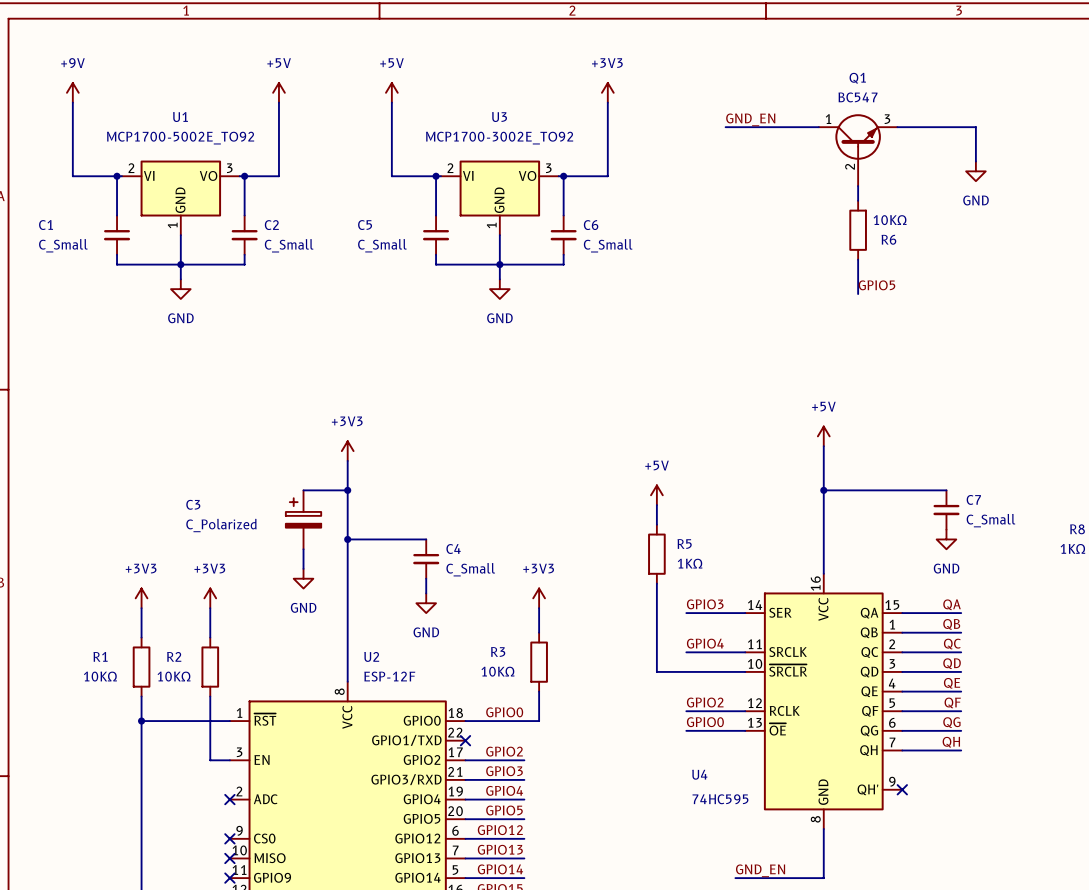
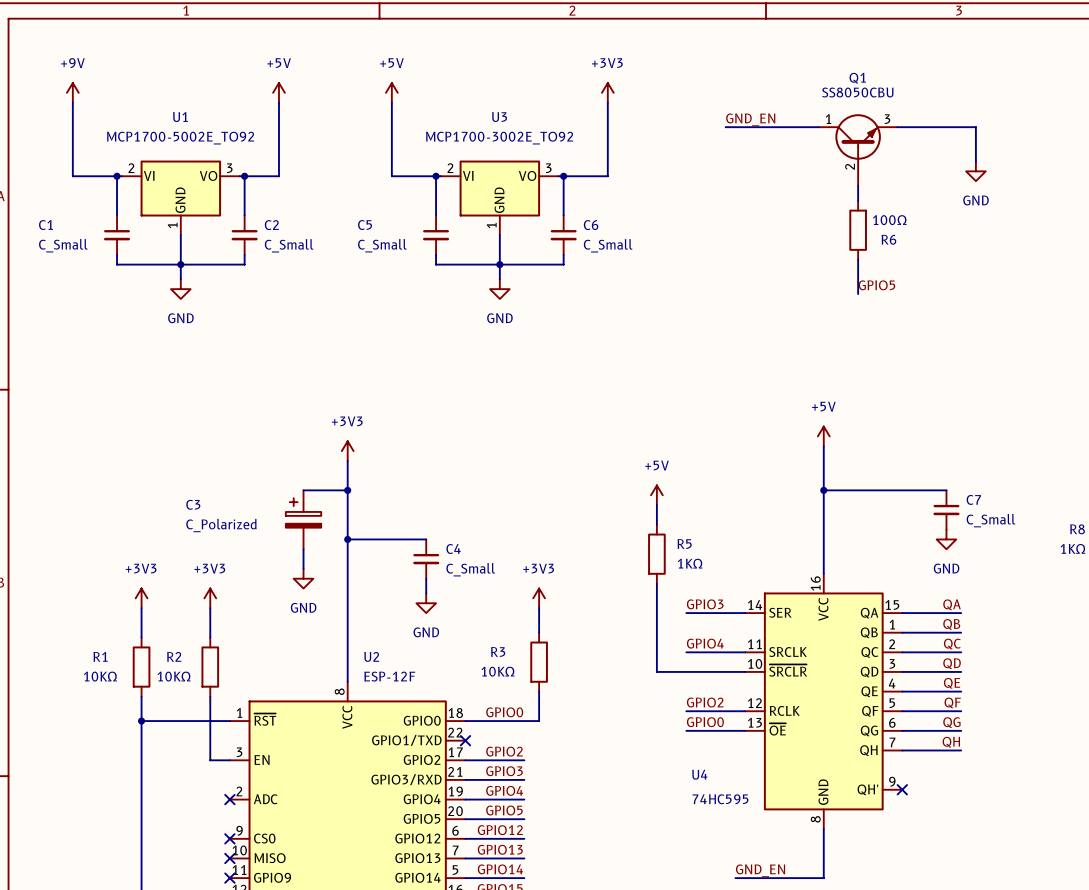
Q1 value: BC547 (858, 97) -> SS8050CBU (857, 92)
R6 value: 10KΩ (890, 220) -> 100Ω (889, 220)

